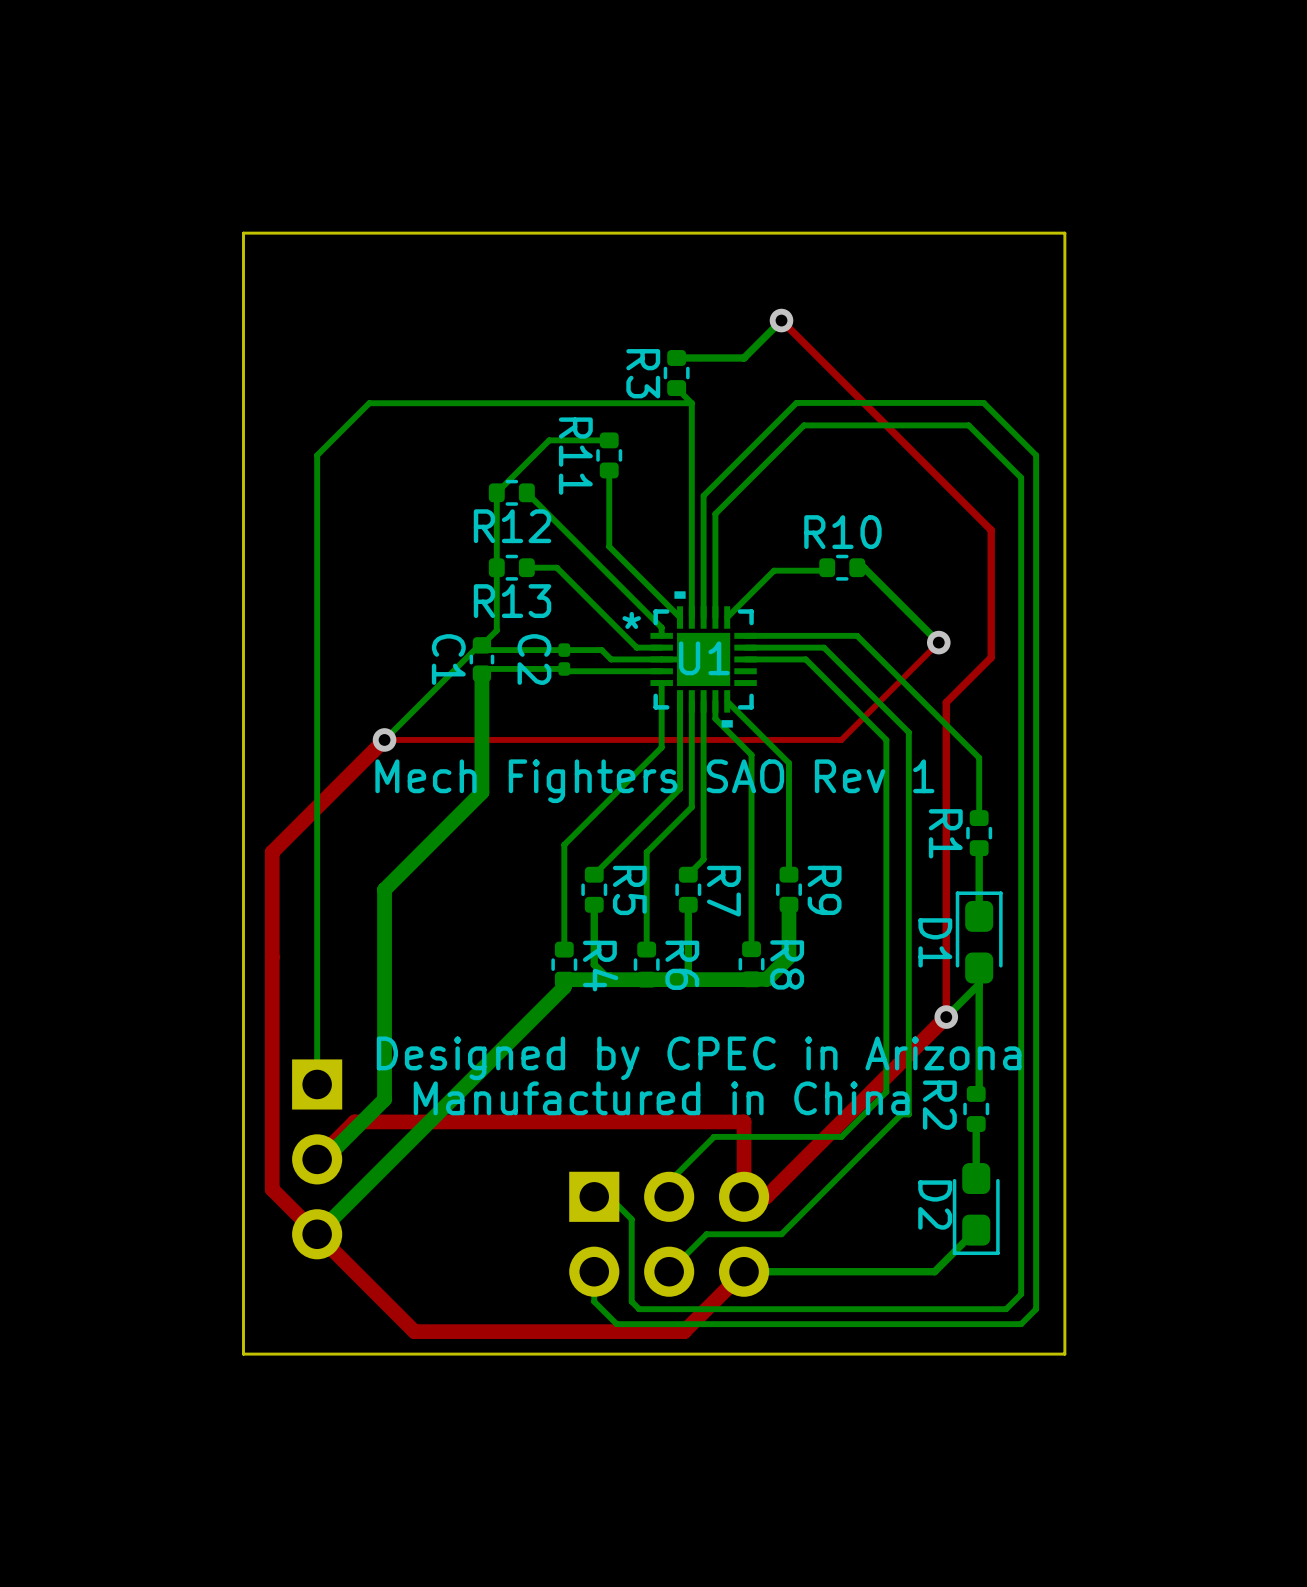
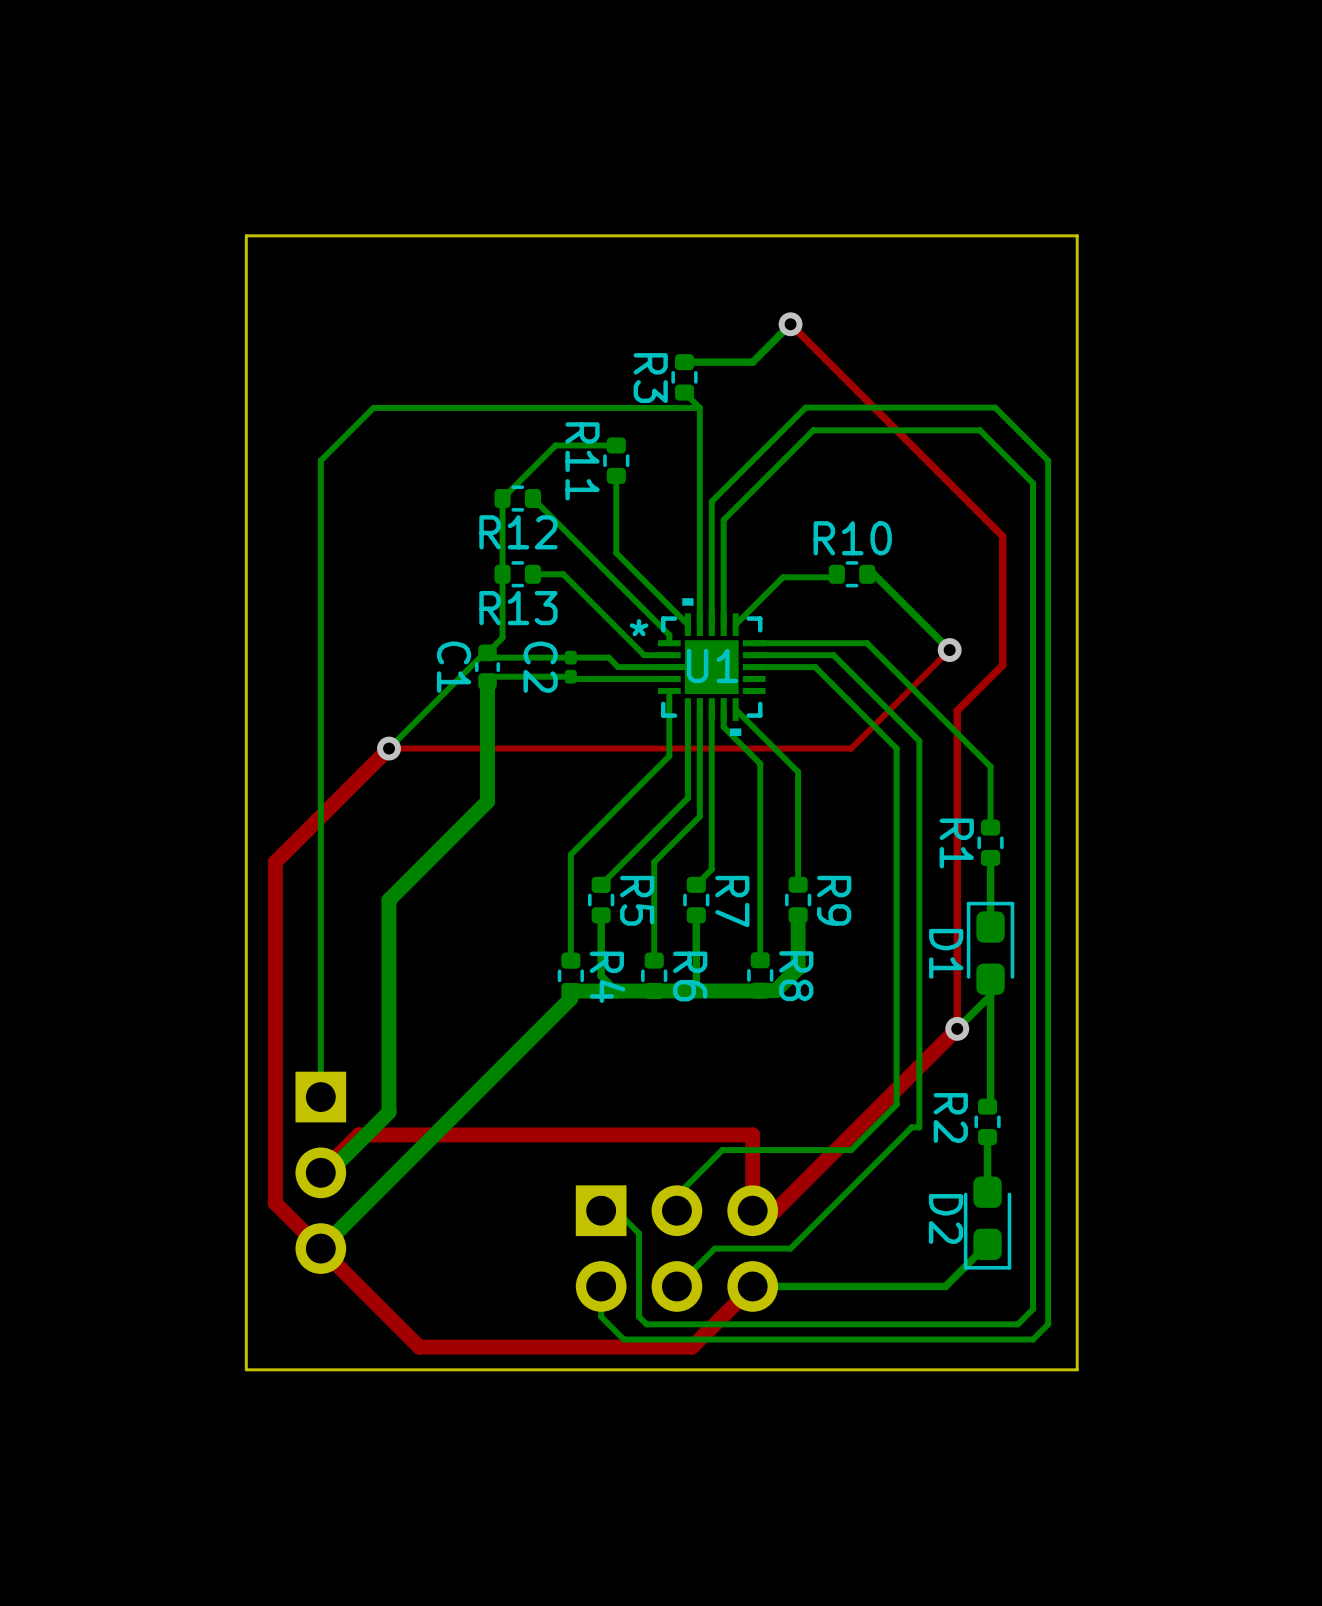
text: Mech Fighters SAO Rev 1 (654, 781) -> none
text: Designed by CPEC in Arizona (699, 1058) -> none
text: Manufactured in China (661, 1098) -> none

